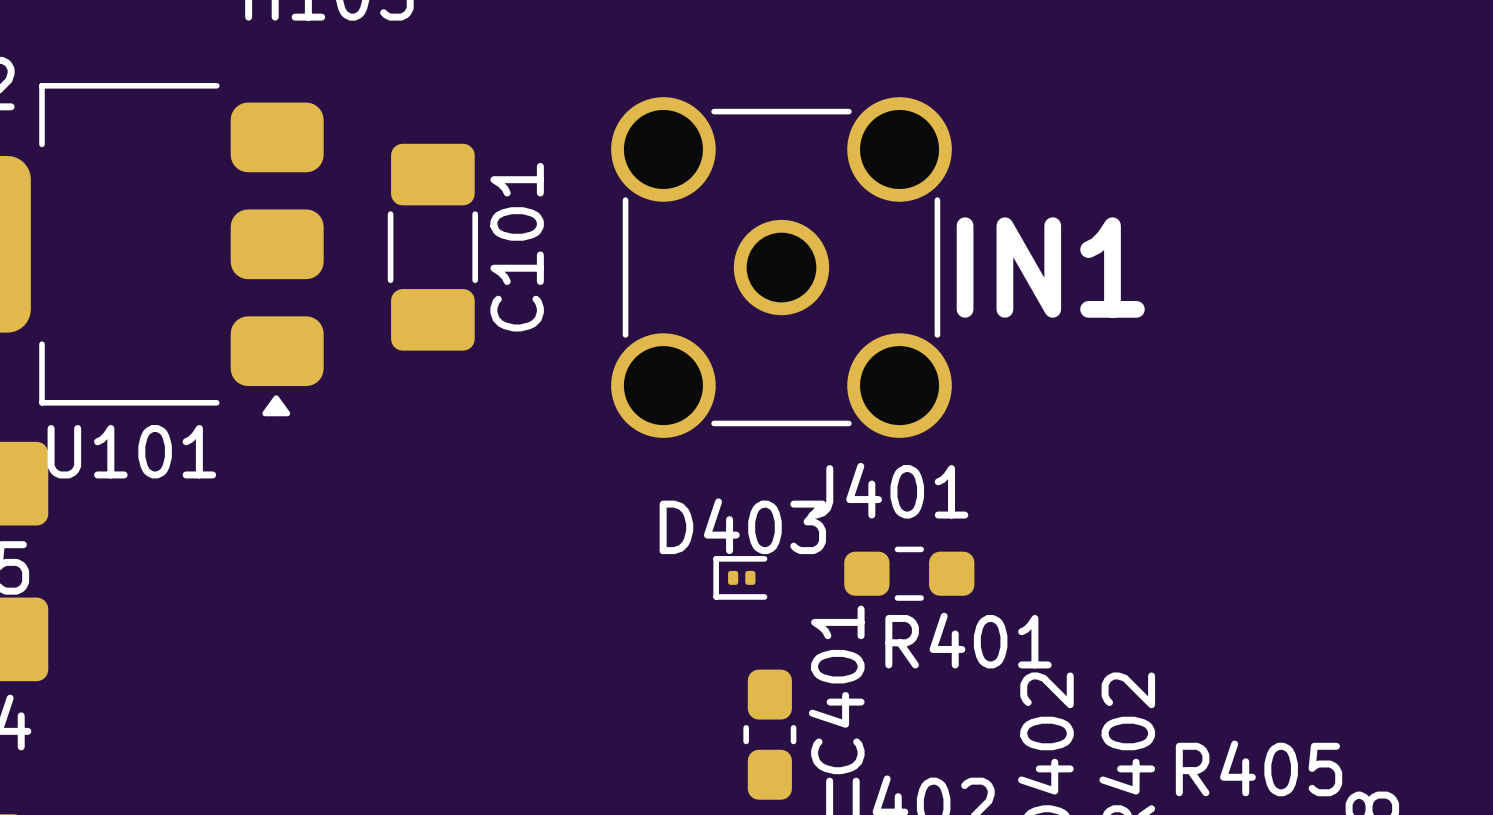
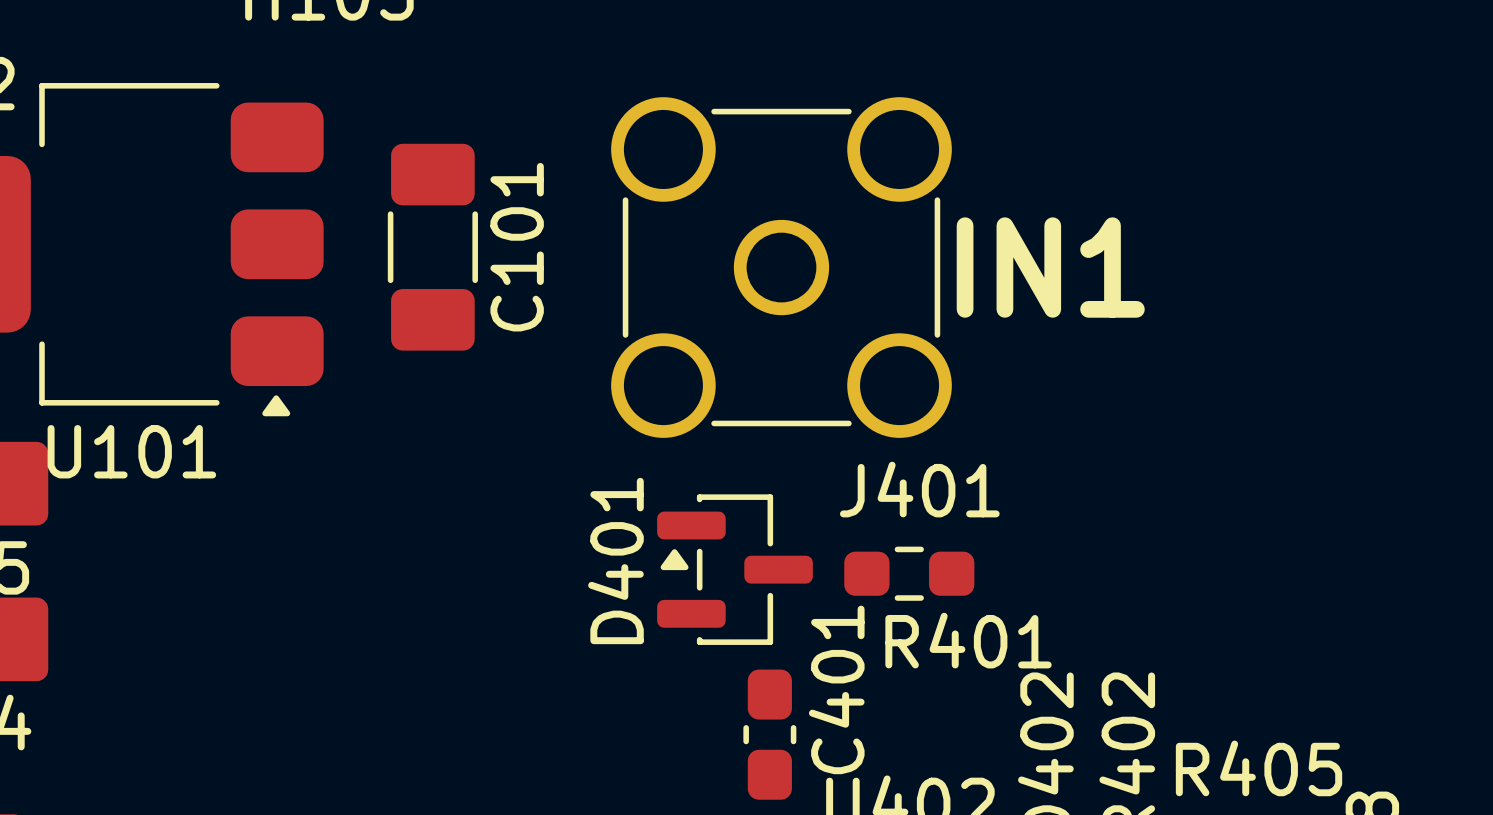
J401 name position: J401 (888, 490) -> J401 (919, 489)
D401: none -> (735, 569)
D403: (740, 577) -> none

